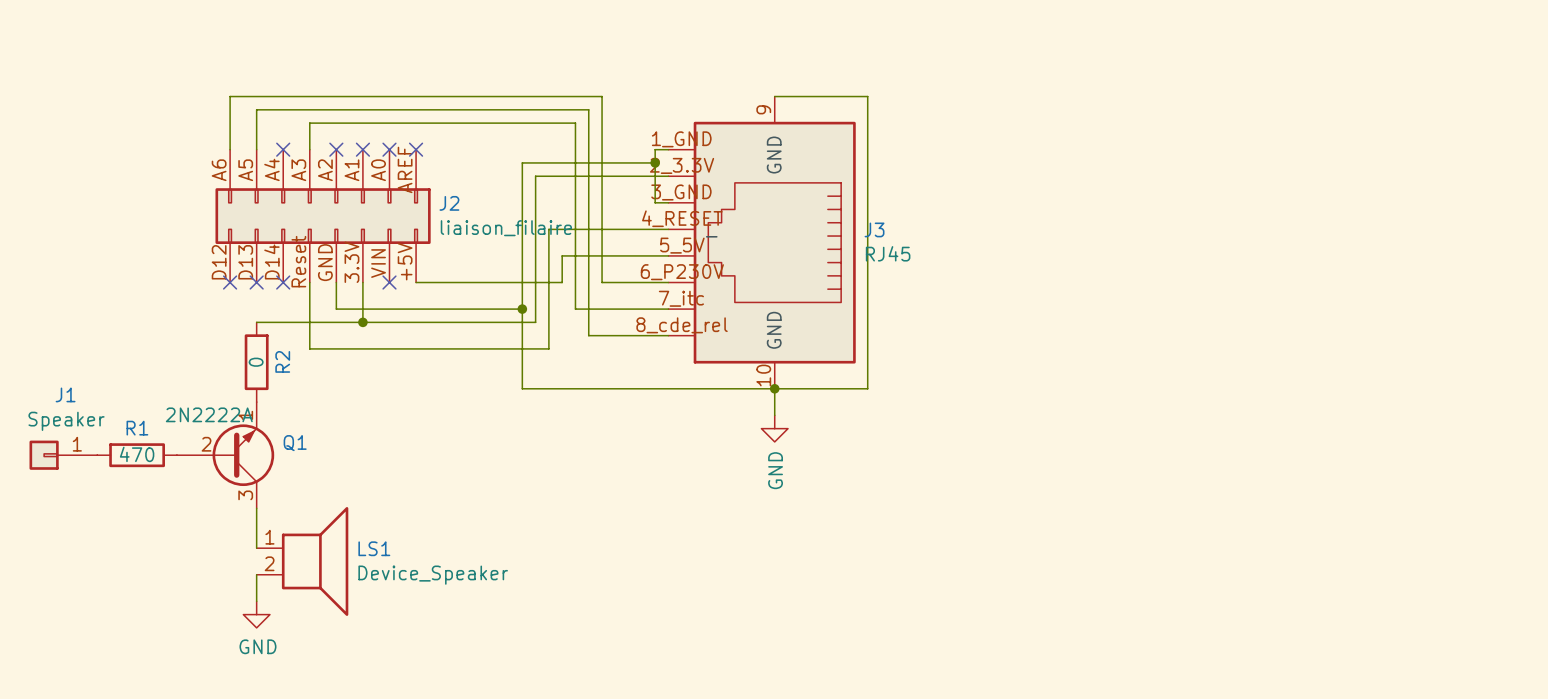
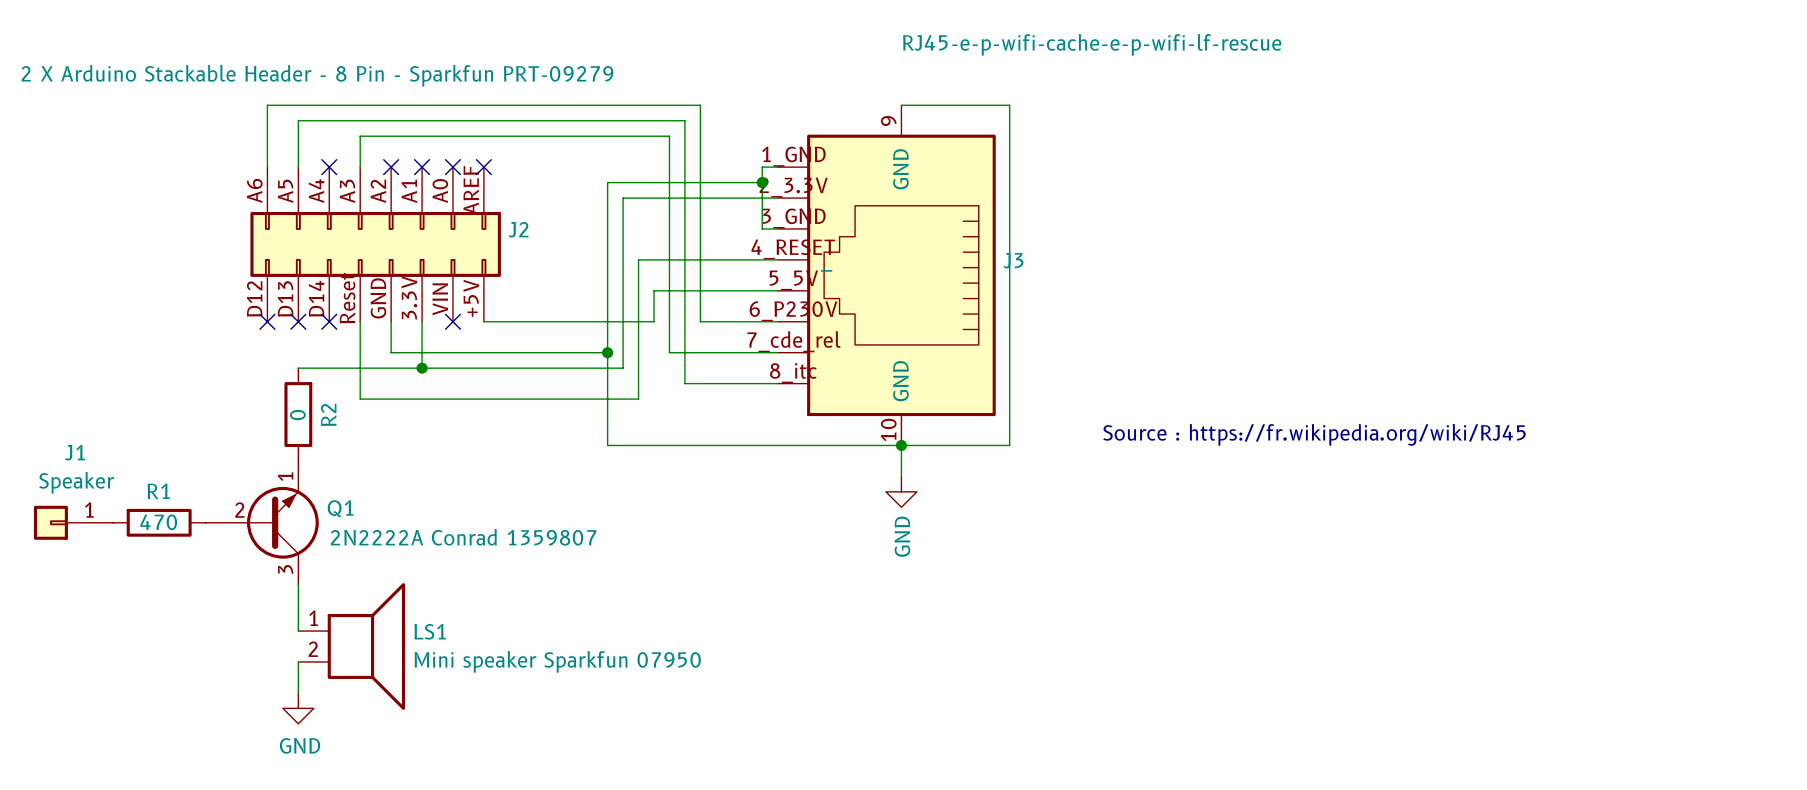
J2 value: liaison_filaire (506, 228) -> 2 X Arduino Stackable Header - 8 Pin - Sparkfun PRT-09279 (317, 75)
J3 value: RJ45 (888, 253) -> RJ45-e-p-wifi-cache-e-p-wifi-lf-rescue (1092, 44)
J3 pin number: 7_itc (681, 298) -> 7_cde_rel (794, 341)
J3 pin number: 8_cde_rel (682, 325) -> 8_itc (793, 373)
text: none -> Source : https://fr.wikipedia.org/wiki/RJ45 (1314, 434)
Q1 value: 2N2222A (209, 414) -> 2N2222A Conrad 1359807 (463, 537)
LS1 value: Device_Speaker (433, 575) -> Mini speaker Sparkfun 07950 (557, 661)

